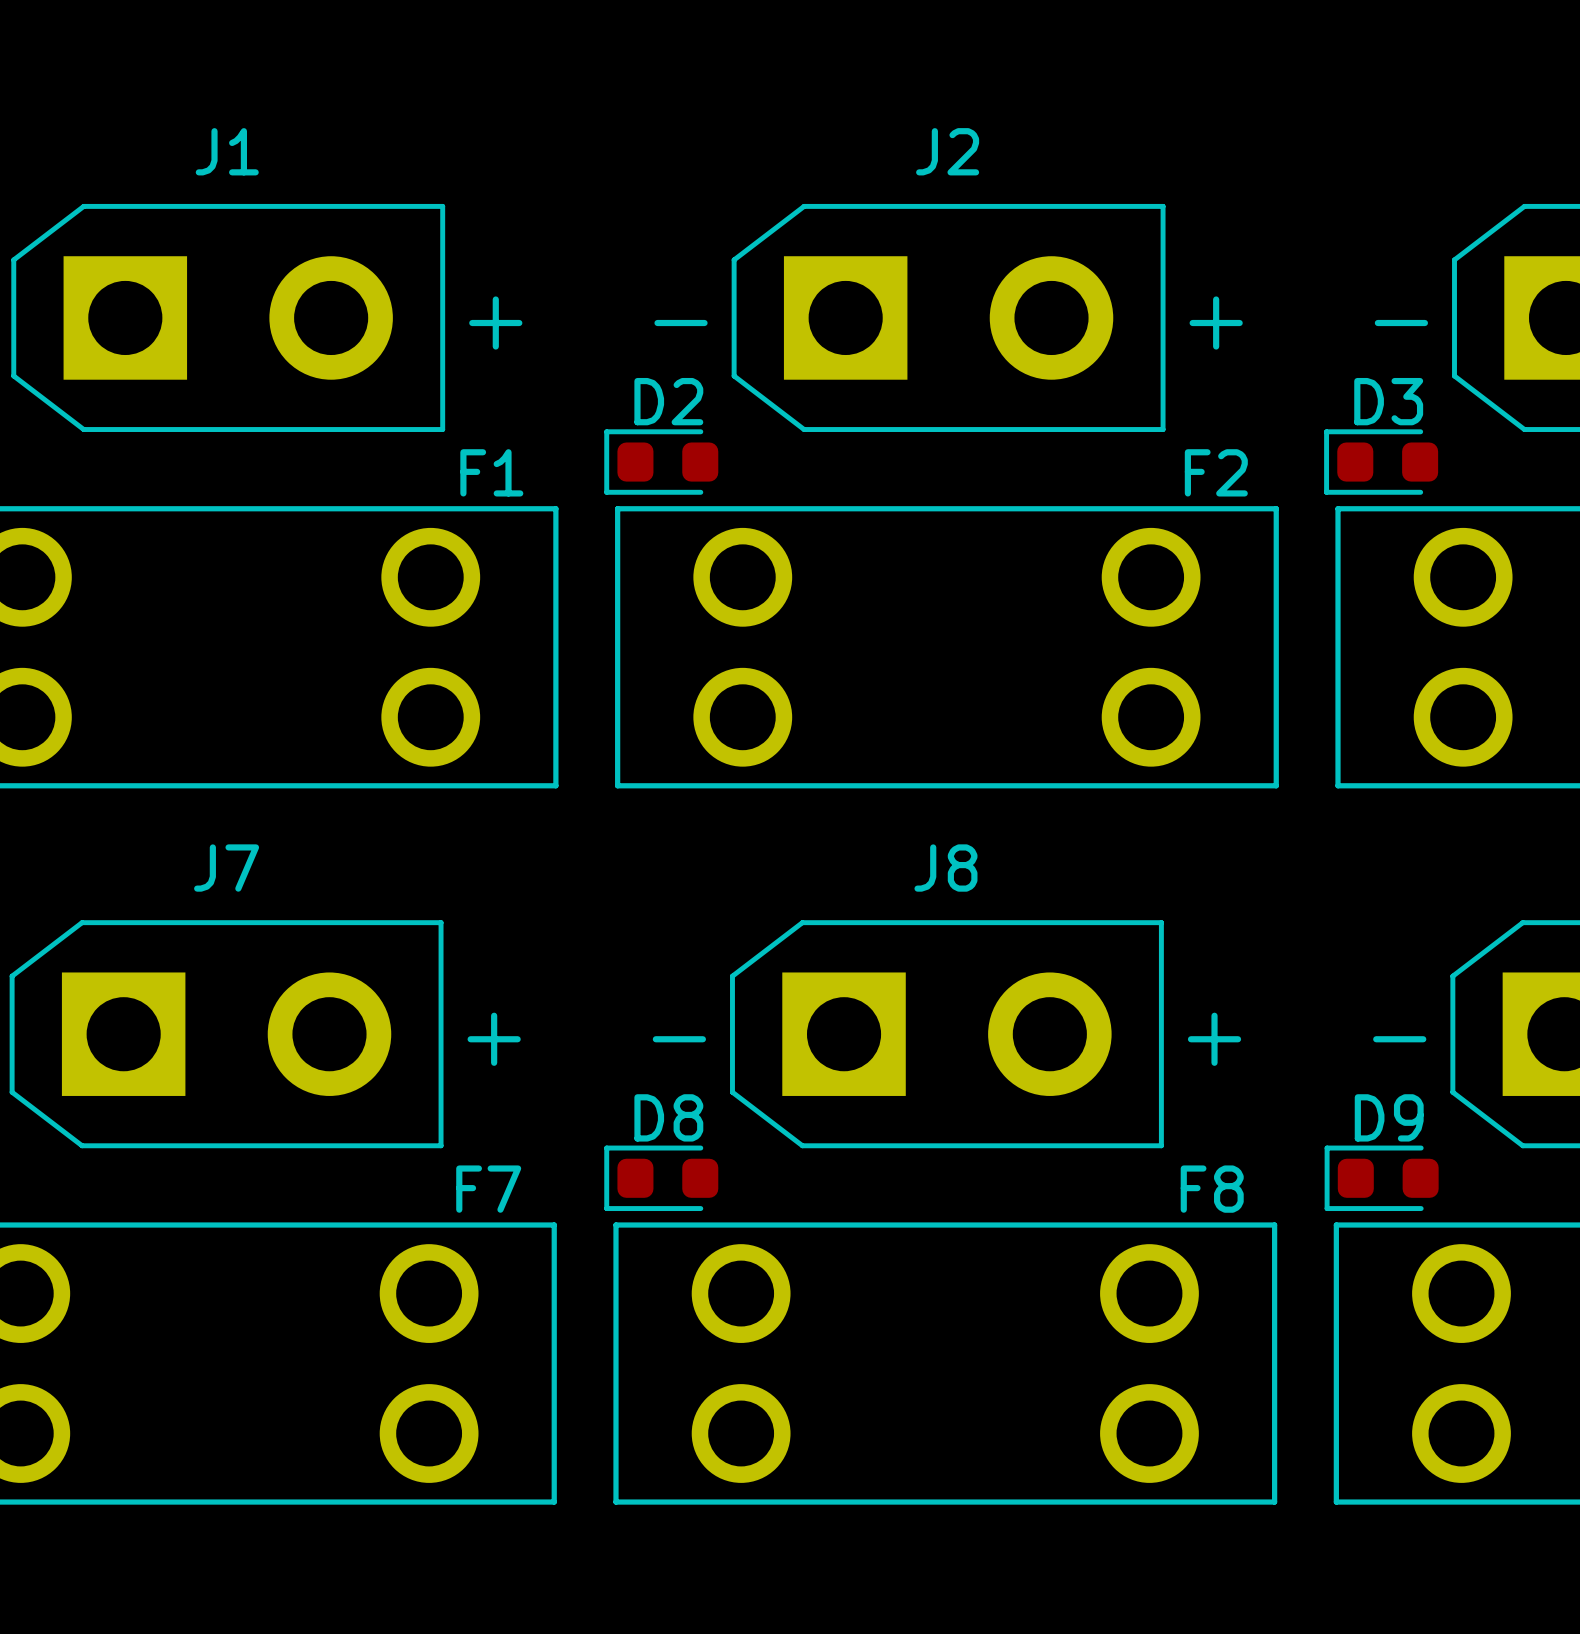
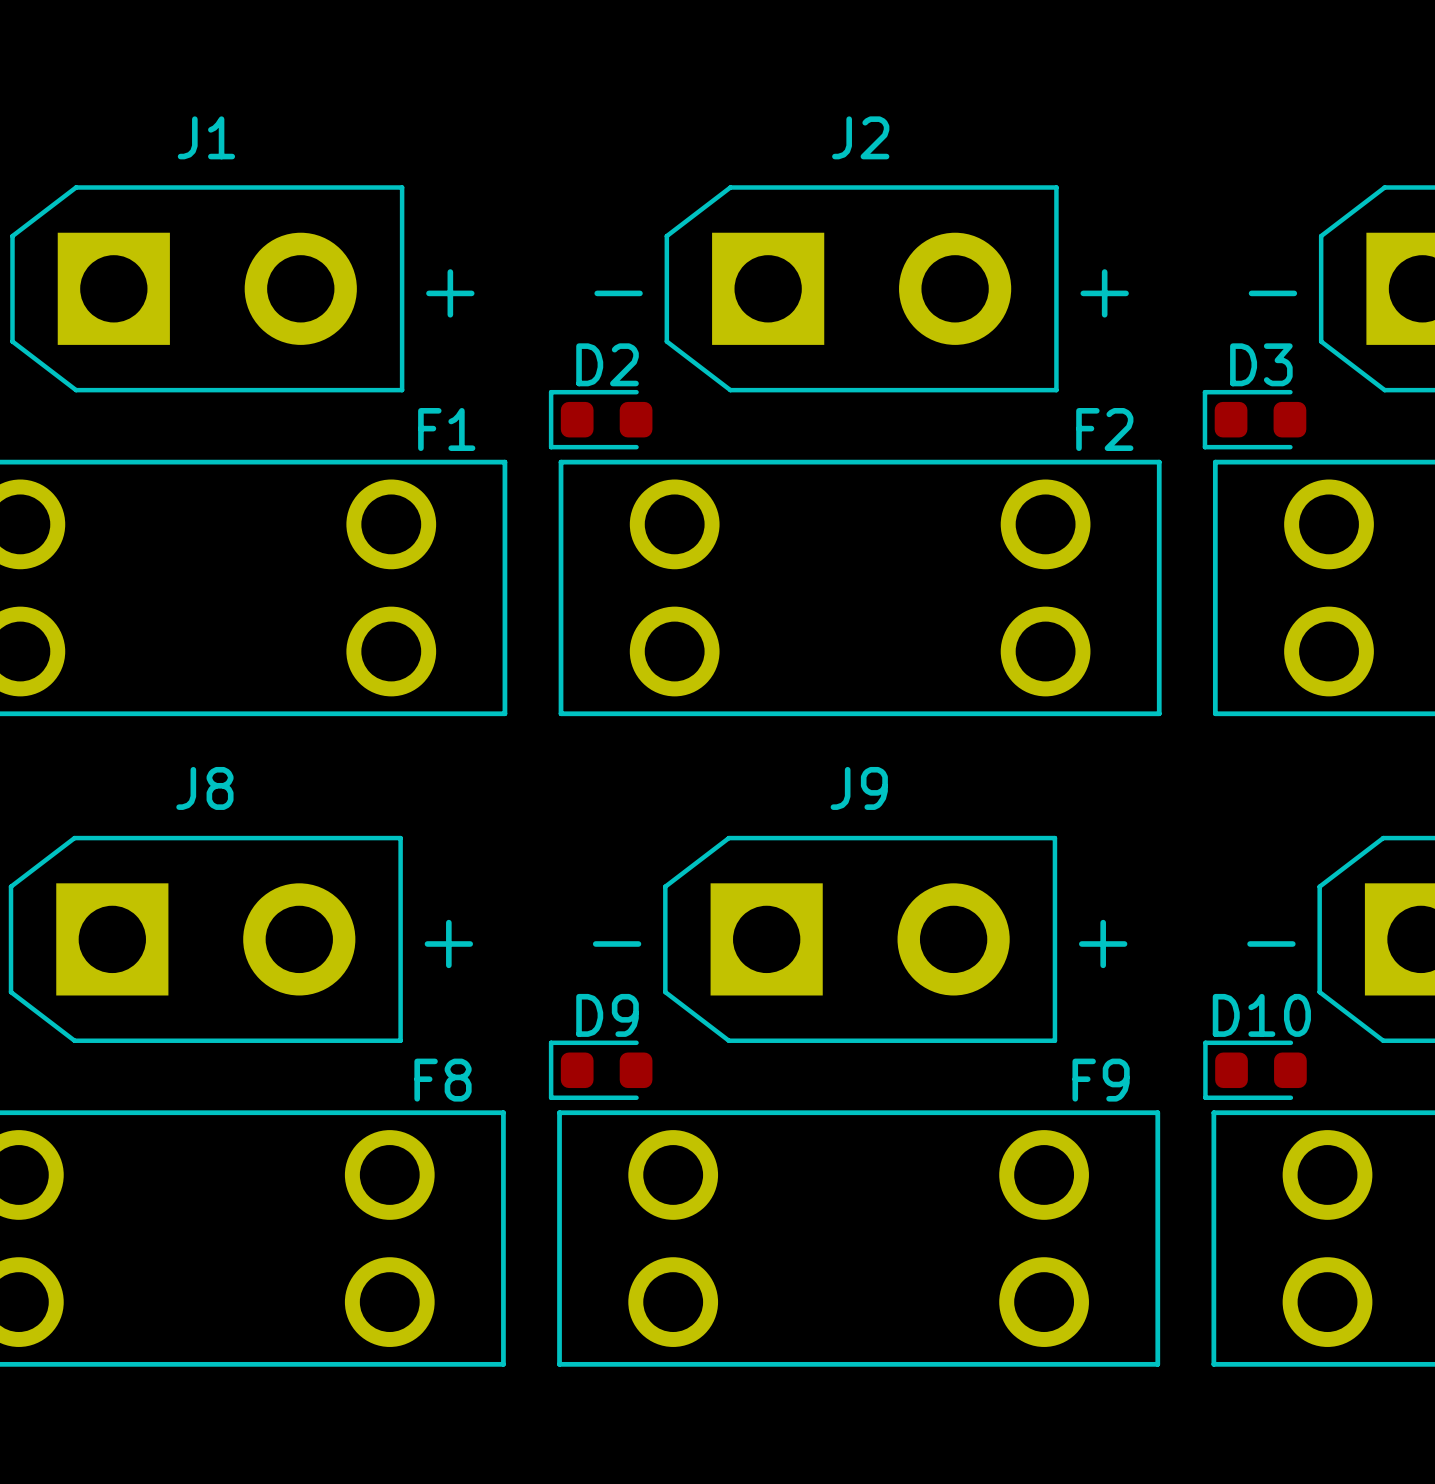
J7 name: J7 (226, 868) -> J8 (204, 788)
J8 name: J8 (945, 868) -> J9 (859, 788)
D8 name: D8 (668, 1117) -> D9 (607, 1015)
D9 name: D9 (1389, 1117) -> D10 (1261, 1015)
F7 name: F7 (488, 1189) -> F8 (443, 1080)
F8 name: F8 (1212, 1189) -> F9 (1101, 1080)

